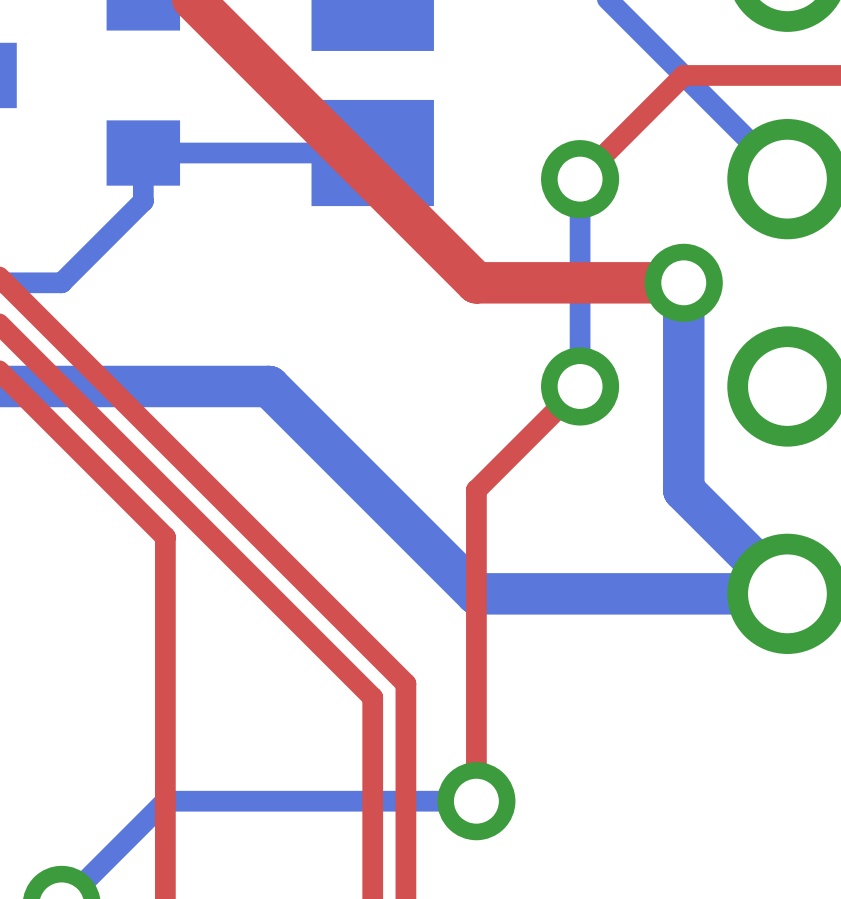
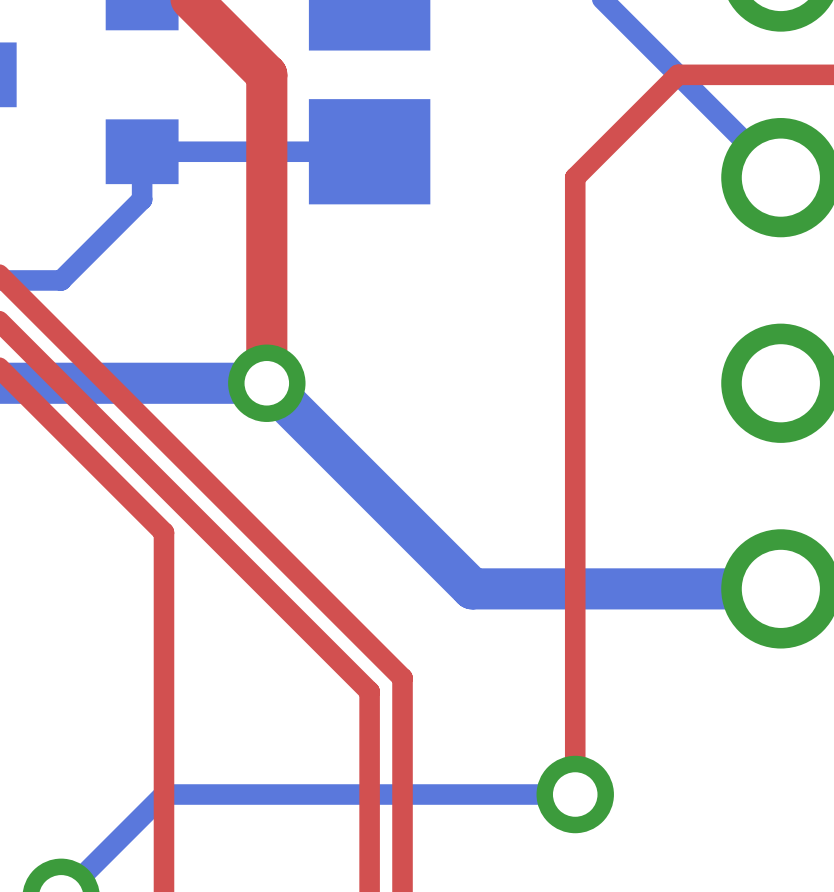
top track: (269, 75) (476, 282) (683, 282) -> (266, 74) (266, 383)
bottom track: (580, 179) (580, 386) -> none
top track: none -> (575, 177) (575, 794)
via: (580, 179) -> none
bottom track: (683, 282) (683, 490) (787, 593) -> none
via: (683, 282) -> none
via: none -> (266, 383)
top track: (580, 386) (476, 490) (476, 801) -> none
via: (580, 386) -> none
bottom track: none -> (472, 794) (575, 794)
via position: (476, 801) -> (575, 794)

